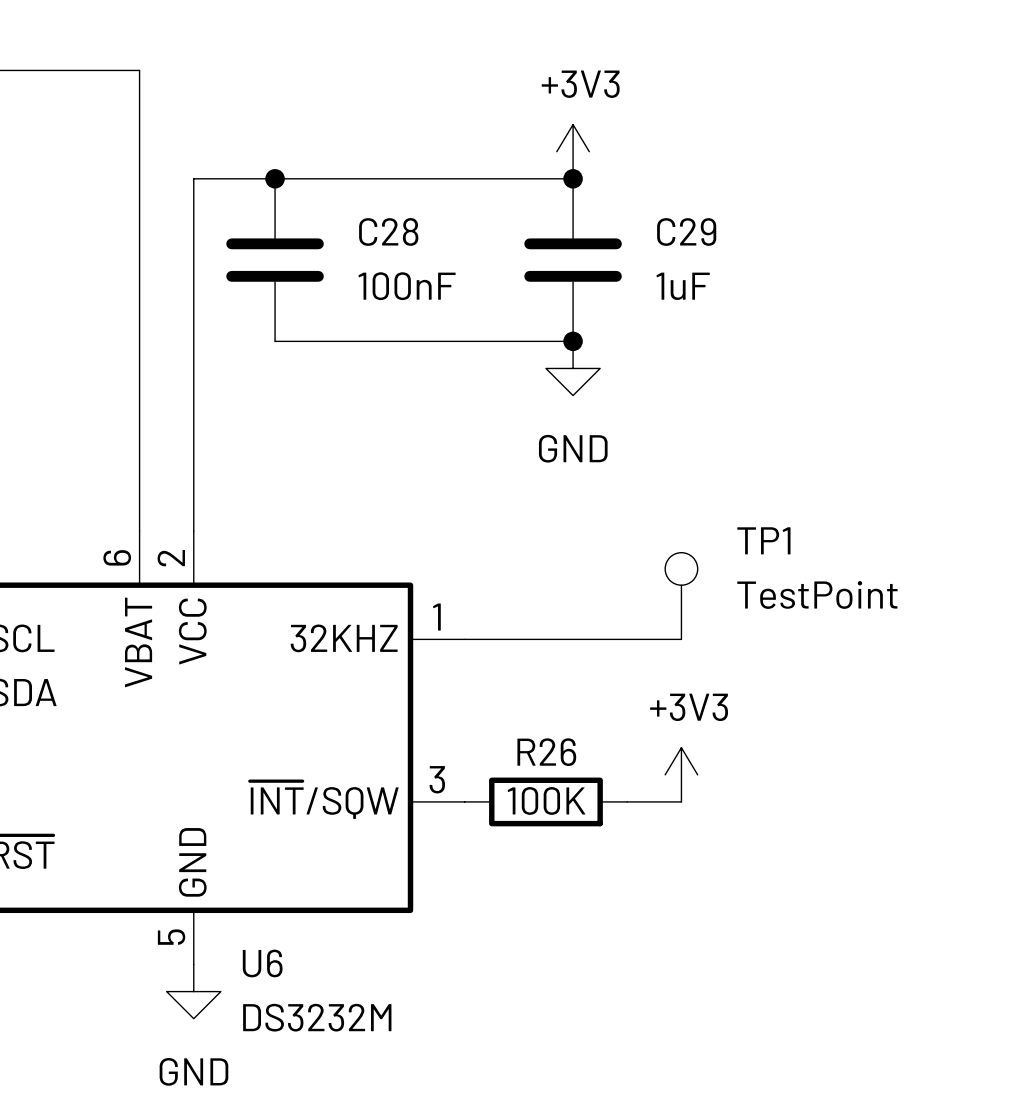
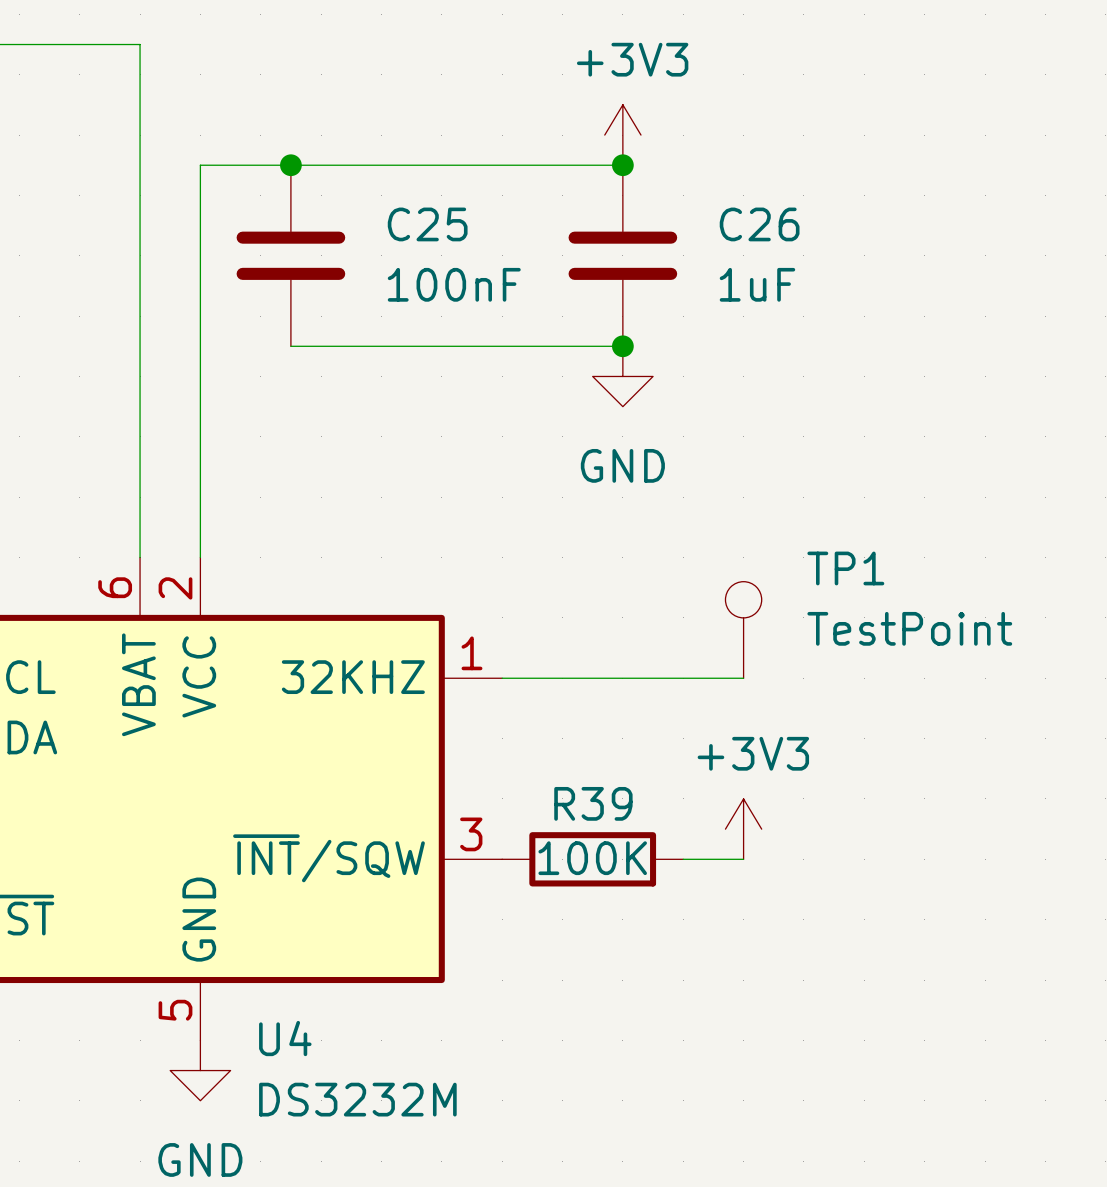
C28 name: C28 (388, 231) -> C25 (427, 224)
C29 name: C29 (686, 232) -> C26 (759, 224)
R26 name: R26 (546, 752) -> R39 (593, 803)
U6 name: U6 (262, 963) -> U4 (285, 1038)

